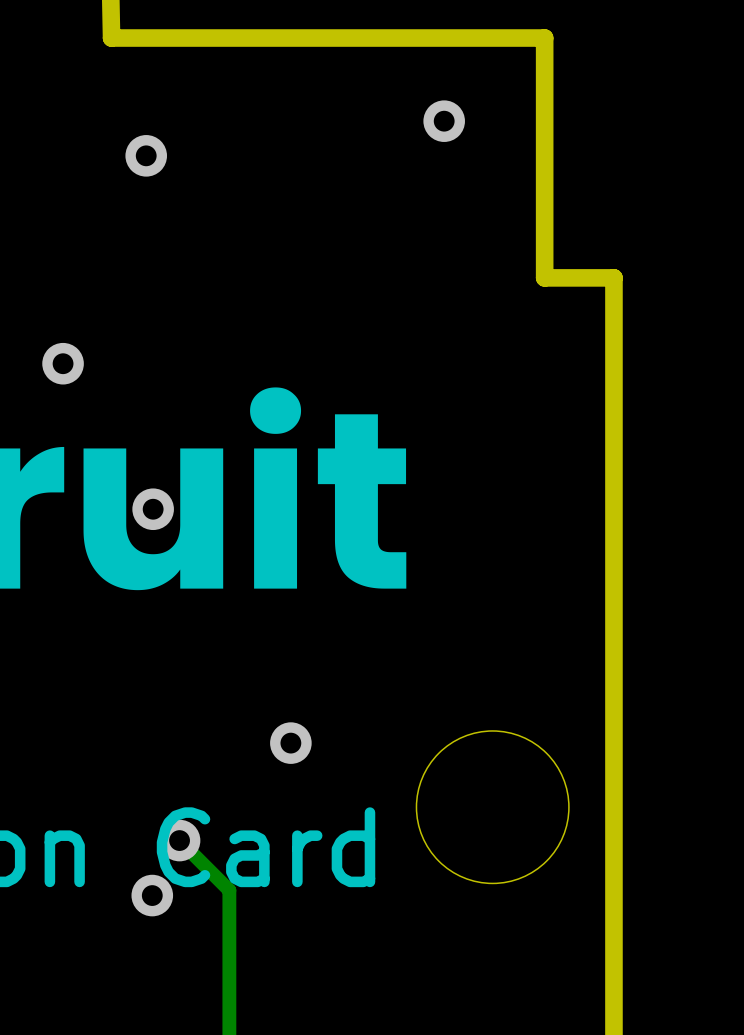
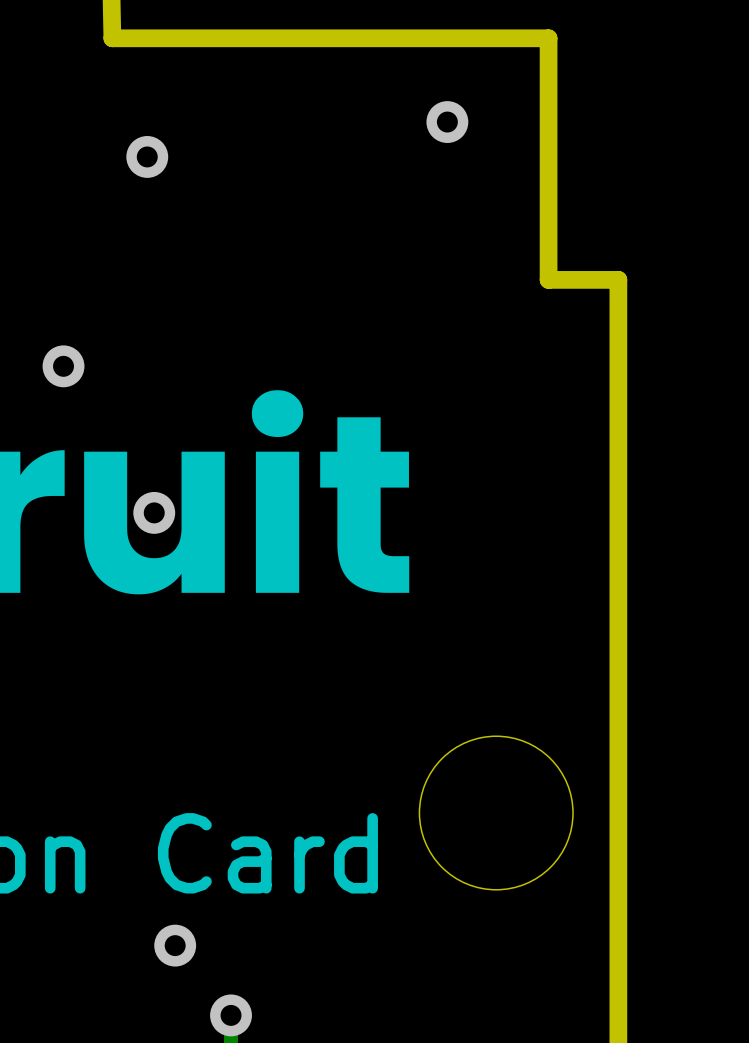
via: (290, 743) -> none
track: (179, 840) (229, 890) (229, 1008) -> none
via: (179, 840) -> none
via position: (152, 895) -> (175, 945)
via: none -> (231, 1015)

